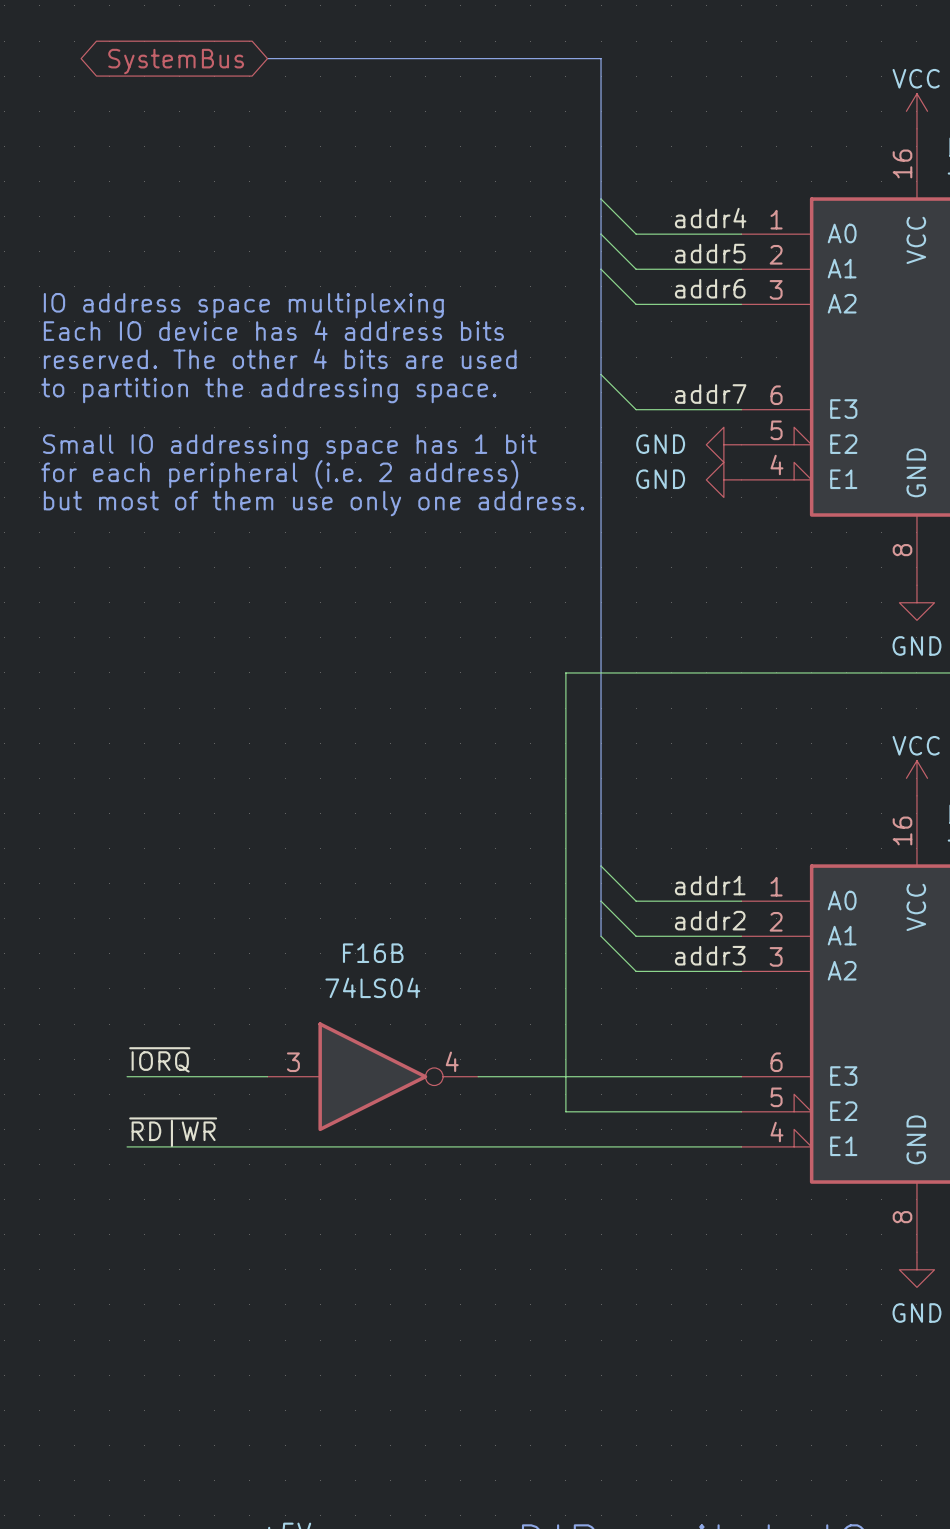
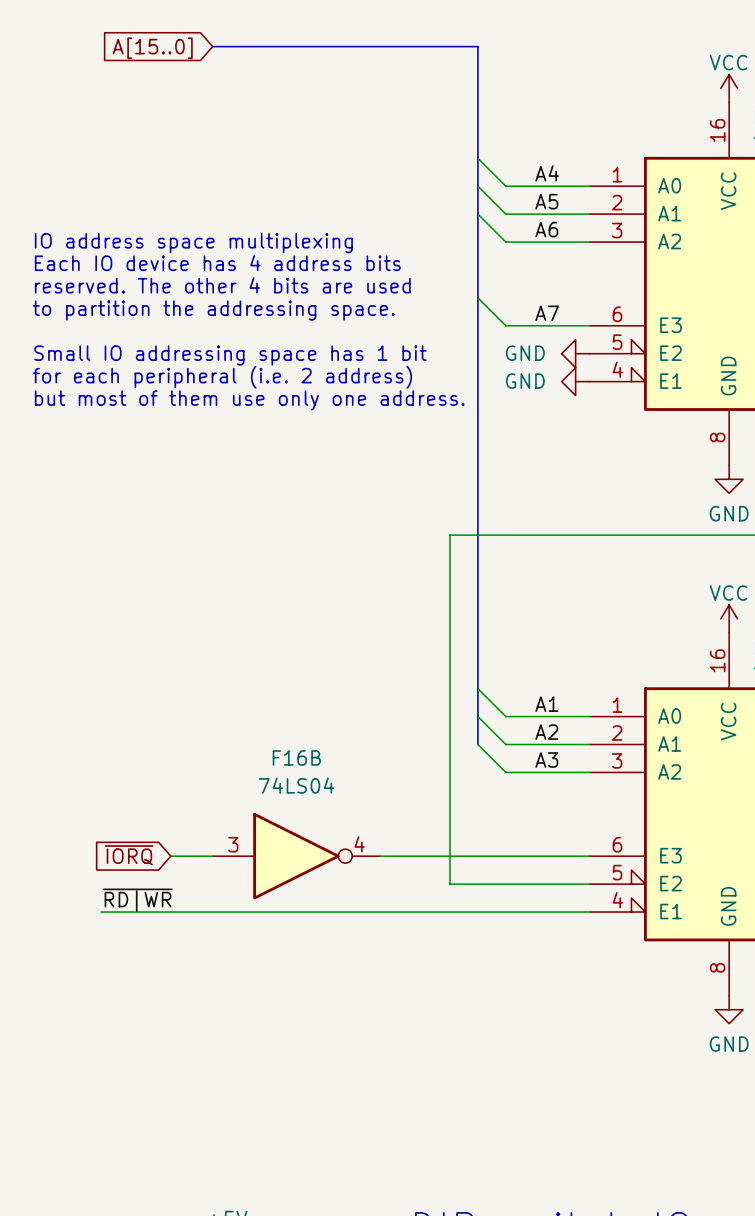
global label shape: bidirectional (176, 61) -> input (152, 48)
global label: SystemBus (176, 61) -> A[15..0] (152, 48)
label: addr4 (710, 218) -> A4 (547, 173)
label: addr5 (710, 253) -> A5 (546, 201)
label: addr6 (710, 288) -> A6 (546, 229)
label: addr7 (710, 394) -> A7 (547, 313)
label: addr1 (710, 885) -> A1 (546, 704)
label: addr2 (710, 920) -> A2 (546, 732)
label: addr3 (710, 955) -> A3 (546, 759)
label: ~{IORQ} (159, 1059) -> none
global label: none -> ~{IORQ} (129, 855)
wire: (127, 1076) (214, 1076) -> none

